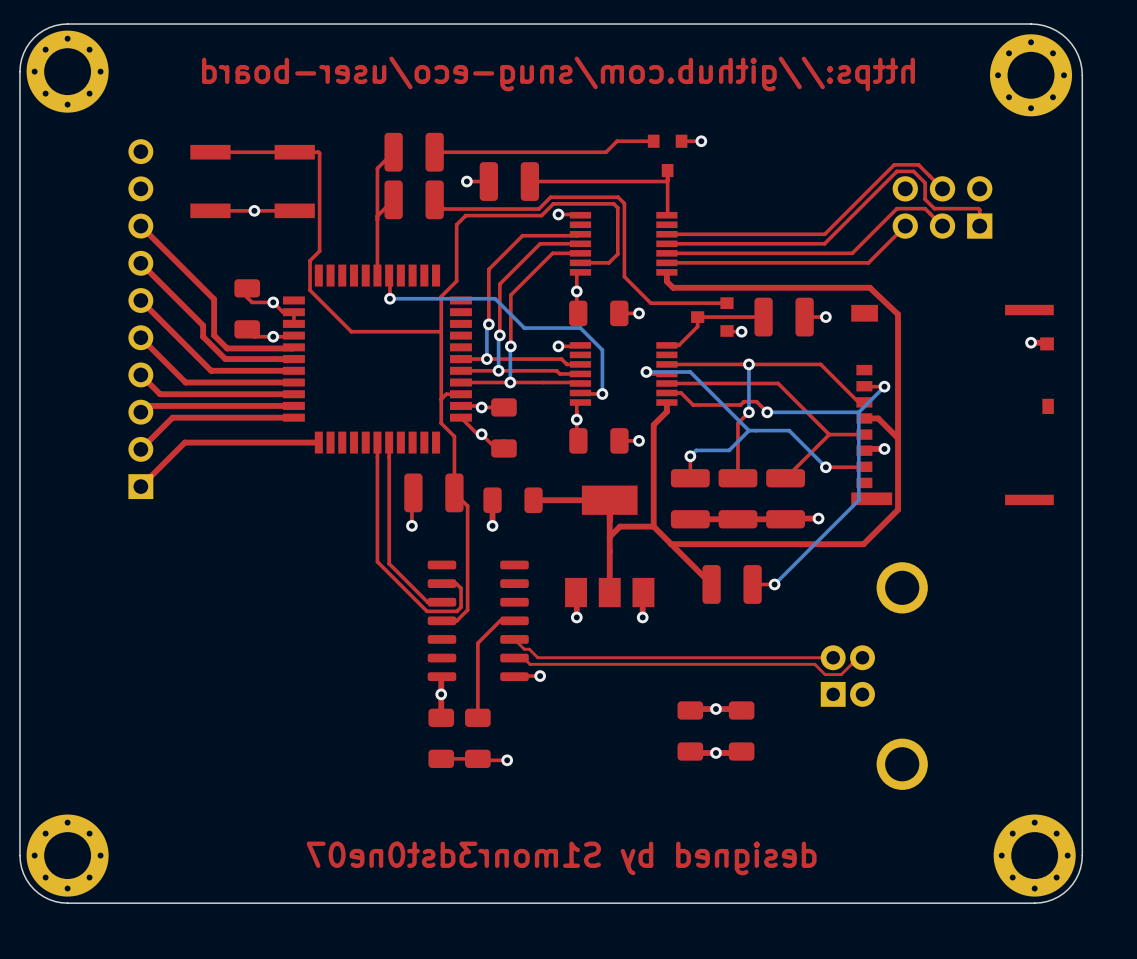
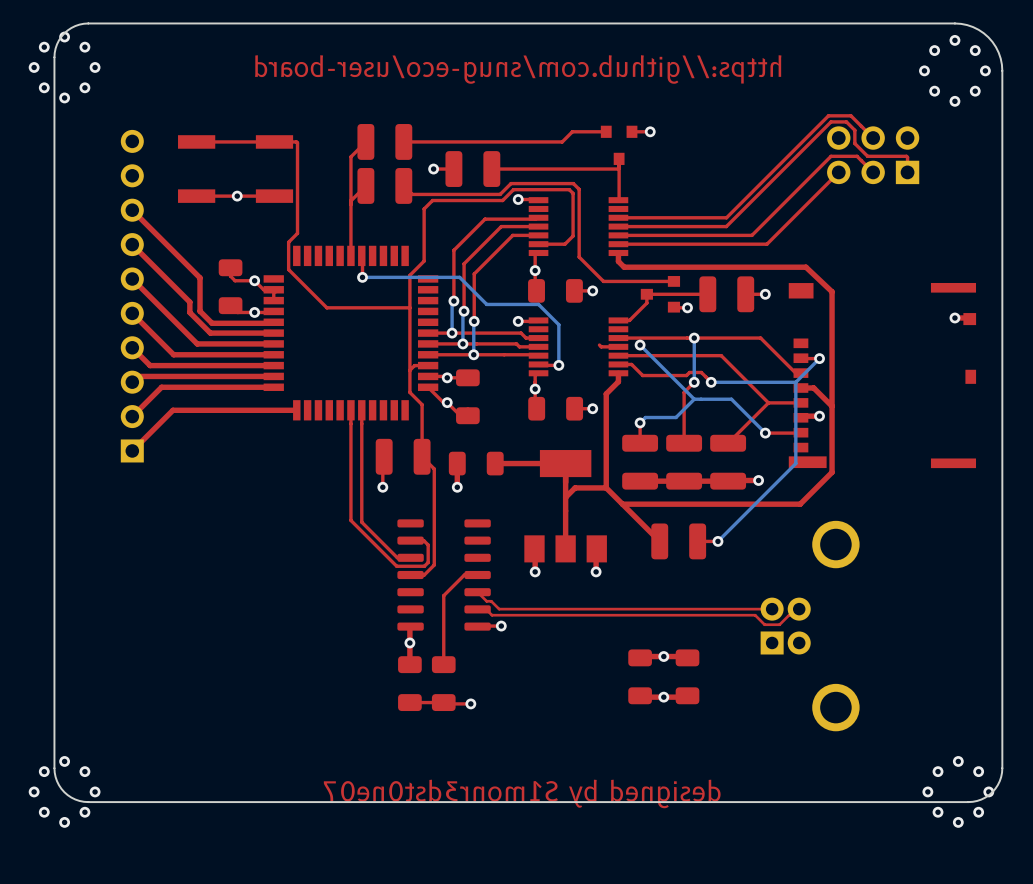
board edge: (93, 24) (61, 24) (43, 30) (33, 37) (26, 47) (21, 59) (19, 71) (19, 855) (21, 867) (26, 879) (38, 893) (55, 901) (67, 903) (1034, 903) (1047, 901) (1058, 896) (1068, 889) (1075, 879) (1081, 861) (1082, 829) -> (88, 23) (75, 26) (64, 33) (57, 44) (54, 57) (54, 768) (57, 781) (67, 795) (79, 800) (88, 802) (968, 802) (981, 799) (992, 792) (999, 781) (1002, 768)
part: (67, 71) -> none
part: (1031, 75) -> none
top track: (942, 188) (918, 164) (894, 164) (824, 234) (783, 234) -> (873, 138) (850, 115) (828, 115) (726, 217)
part position: (942, 207) -> (873, 155)
top track: (905, 226) (868, 262) (827, 262) -> (838, 172) (766, 244)
top track: (942, 226) (925, 208) (896, 208) (852, 253) (811, 253) -> (873, 172) (857, 156) (831, 156) (751, 235)
top track: (979, 226) (978, 208) (934, 208) (925, 199) (925, 182) (913, 171) (896, 171) (824, 243) (783, 243) -> (907, 172) (906, 156) (867, 156) (854, 143) (854, 130) (846, 121) (831, 121) (726, 226)
via position: (646, 372) -> (640, 345)
bottom track: (690, 372) (646, 372) -> none
part: (67, 855) -> none
part: (1034, 855) -> none

